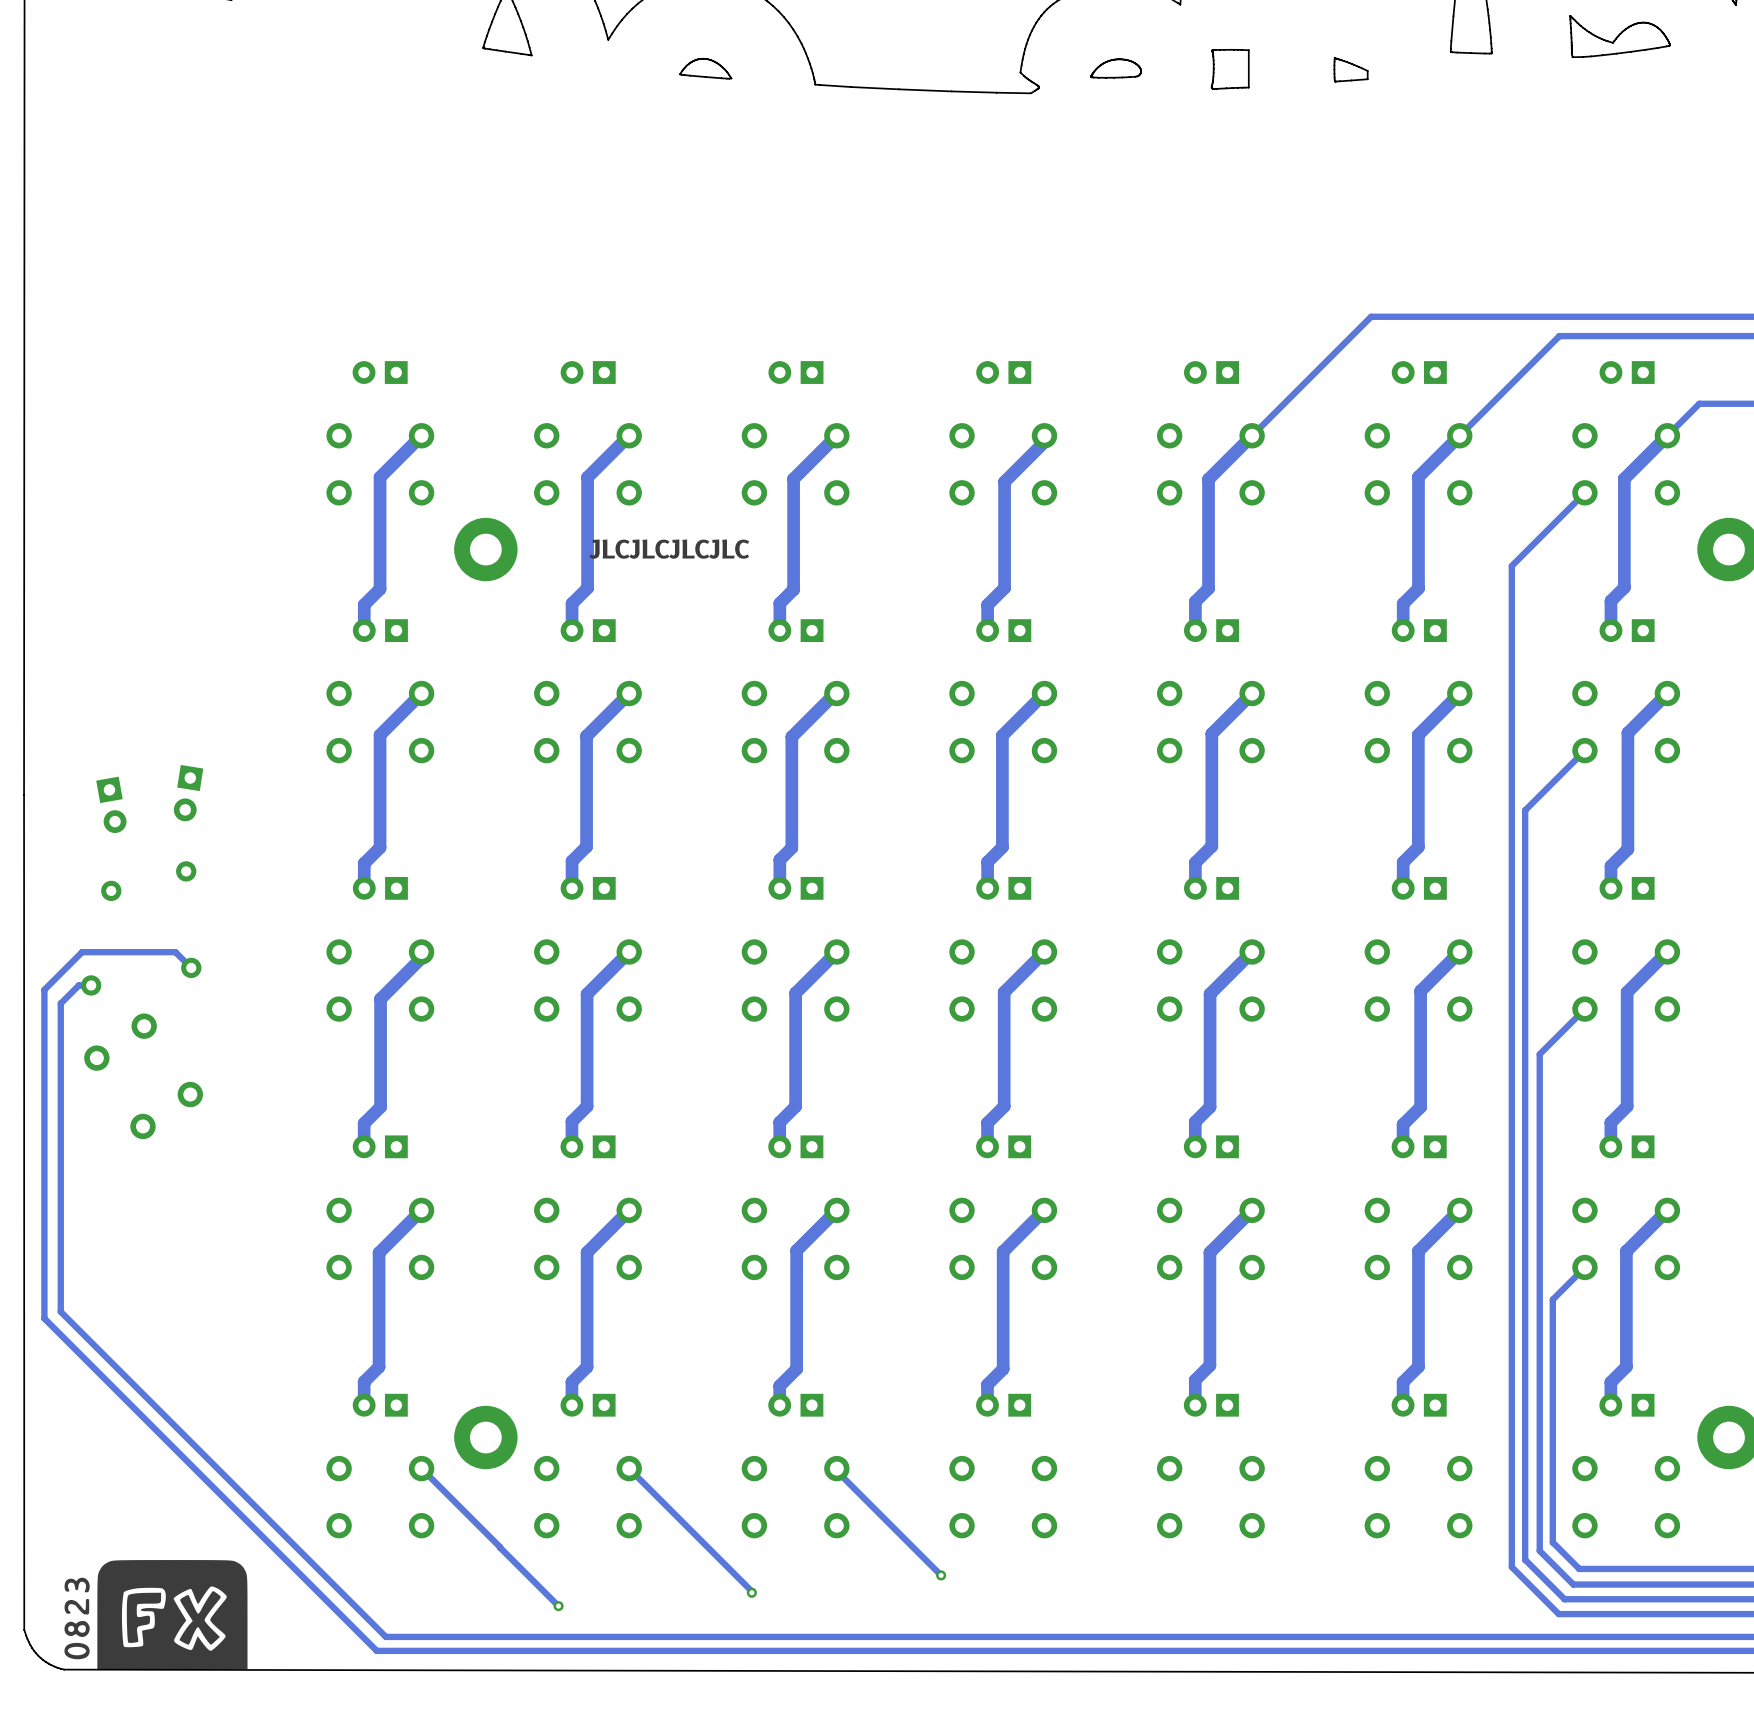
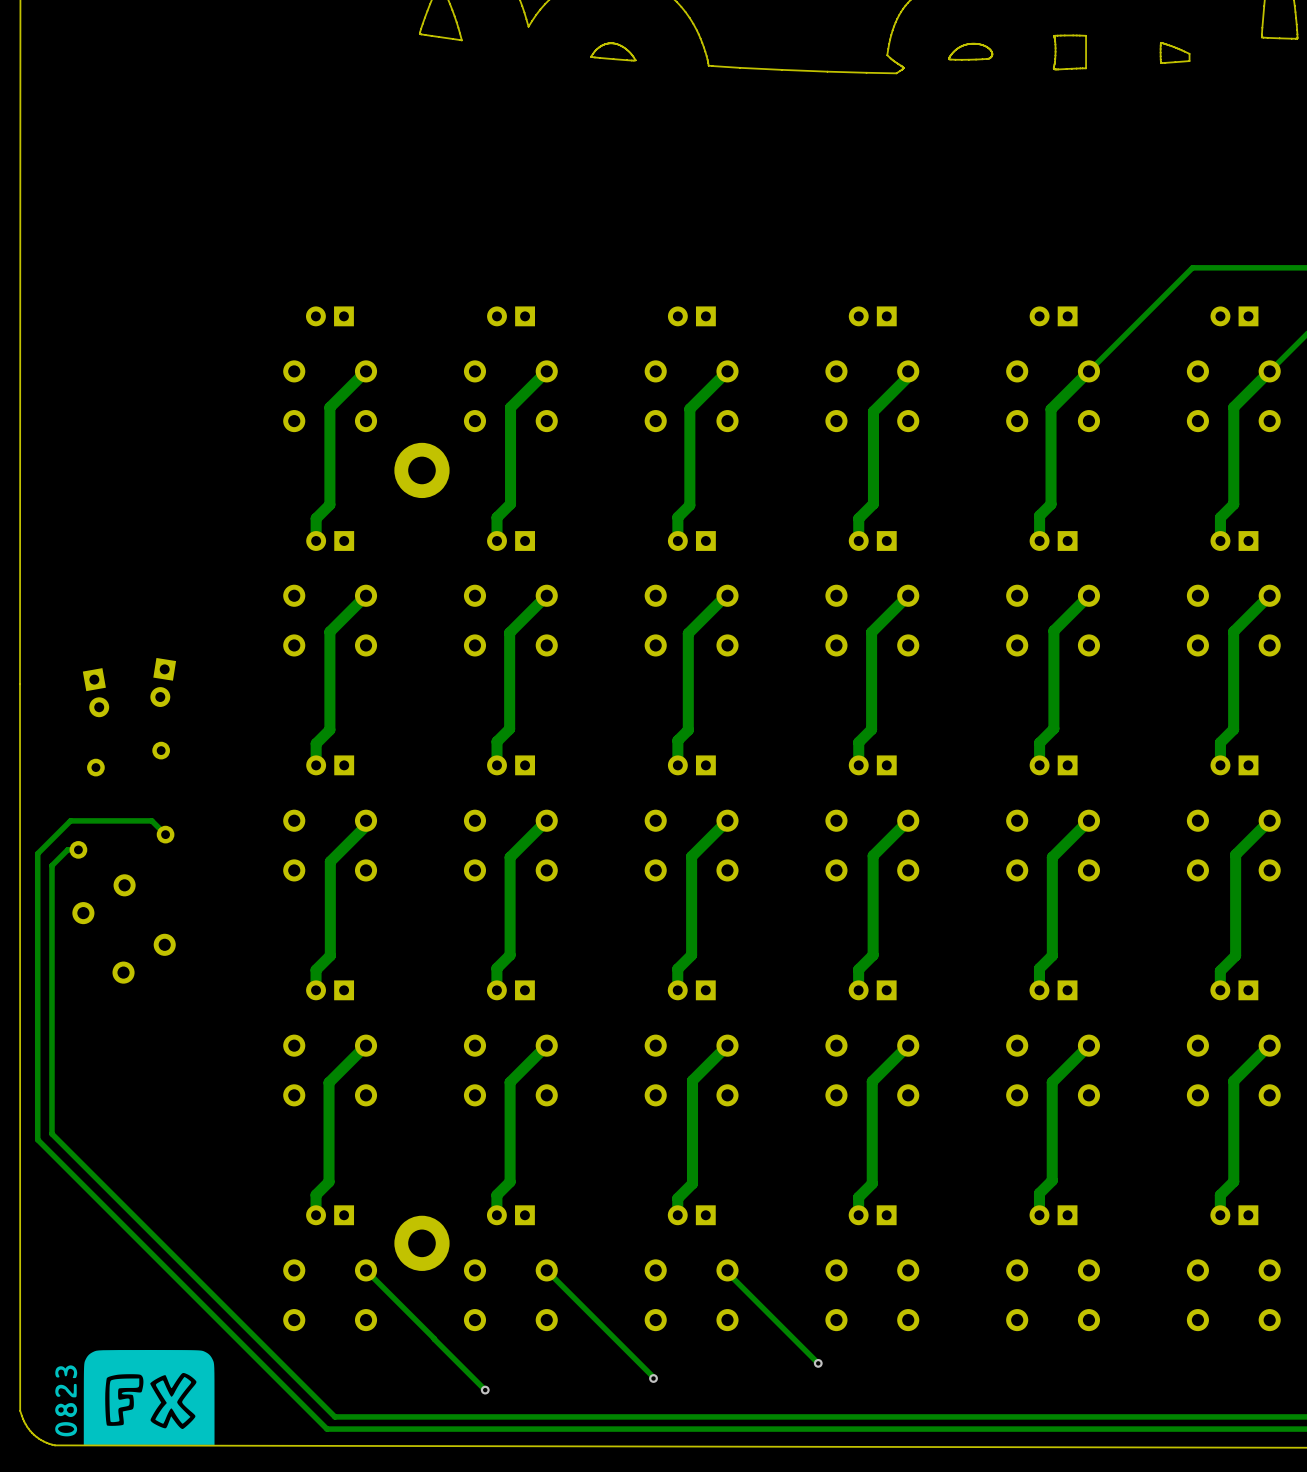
text: JLCJLCJLCJLC (669, 549) -> none

